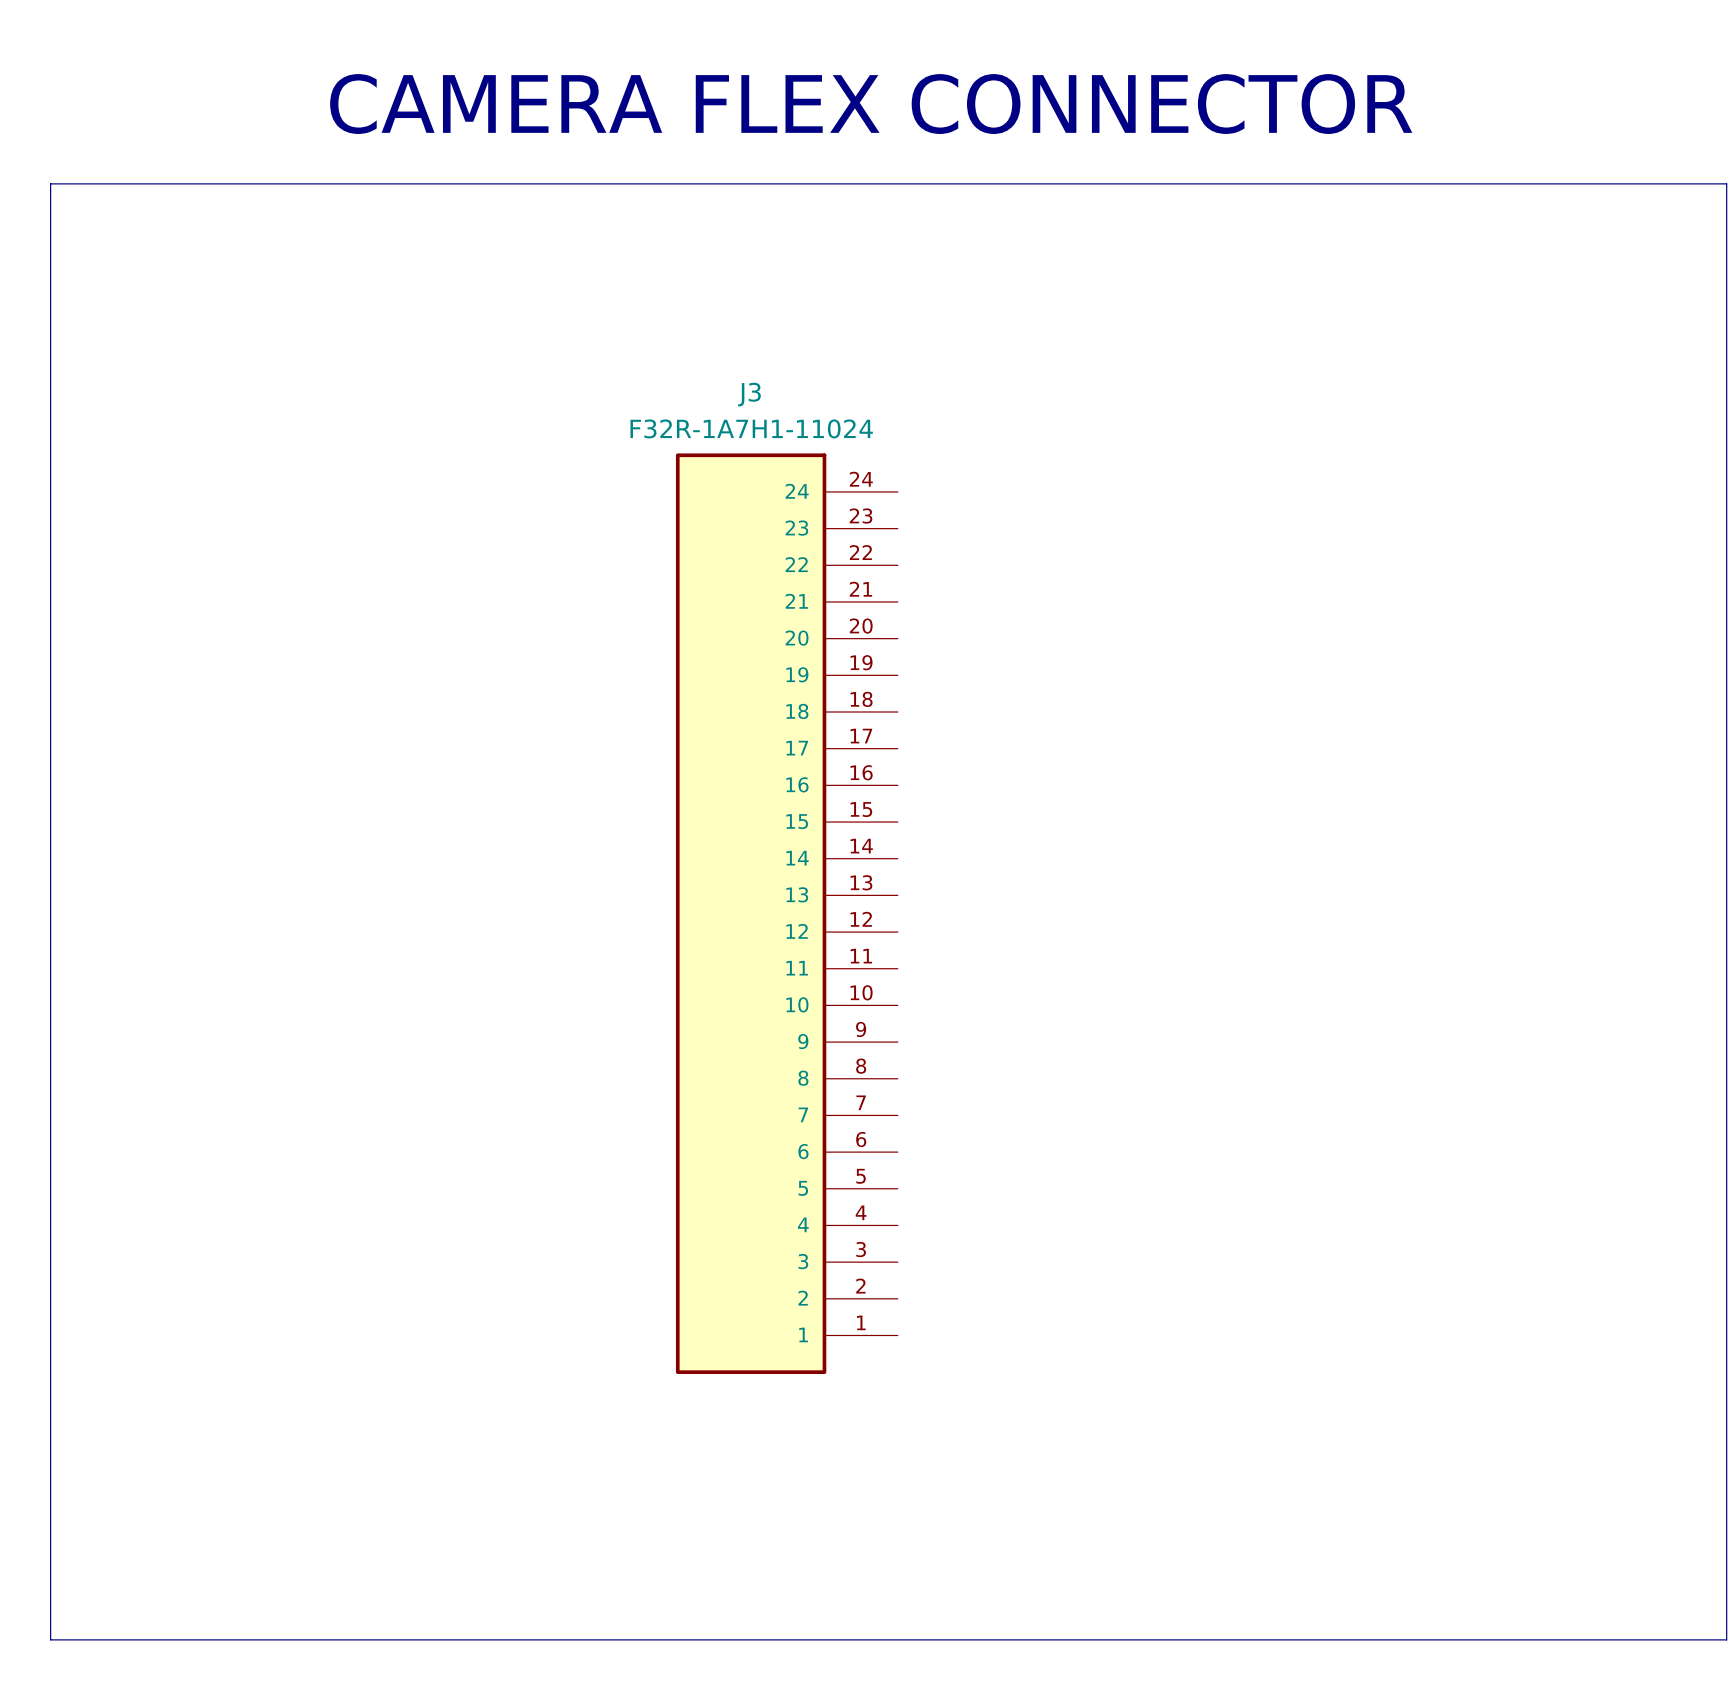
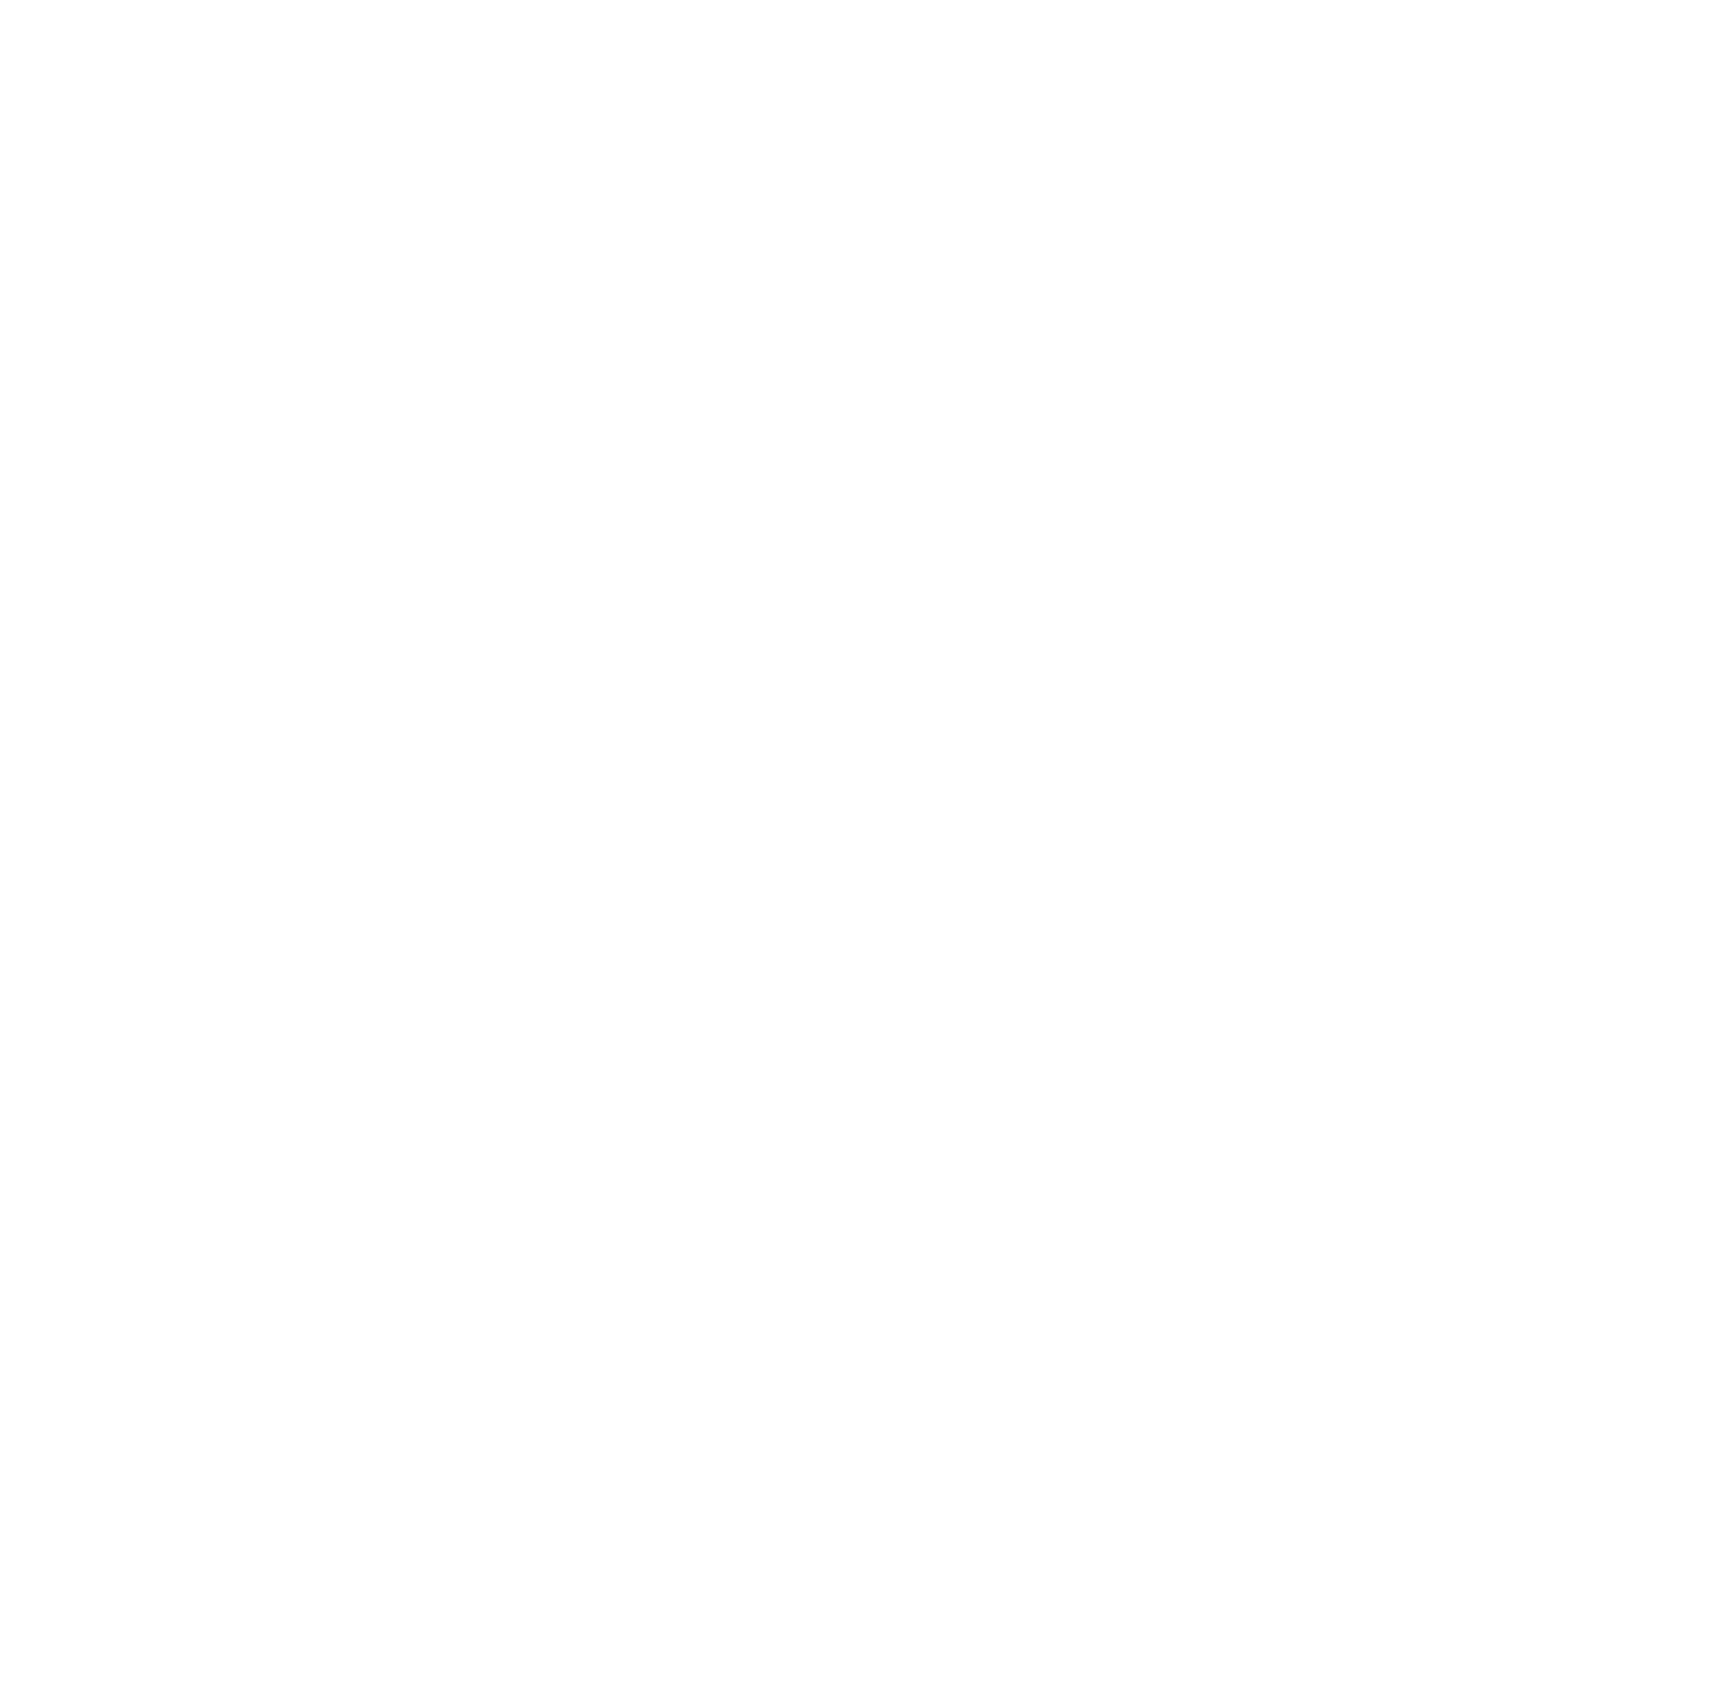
text: CAMERA FLEX CONNECTOR (871, 104) -> none
line: (50, 183) (1726, 183) (1726, 1639) (50, 1639) (50, 183) -> none
J3: F32R-1A7H1-11024 (786, 913) -> none

